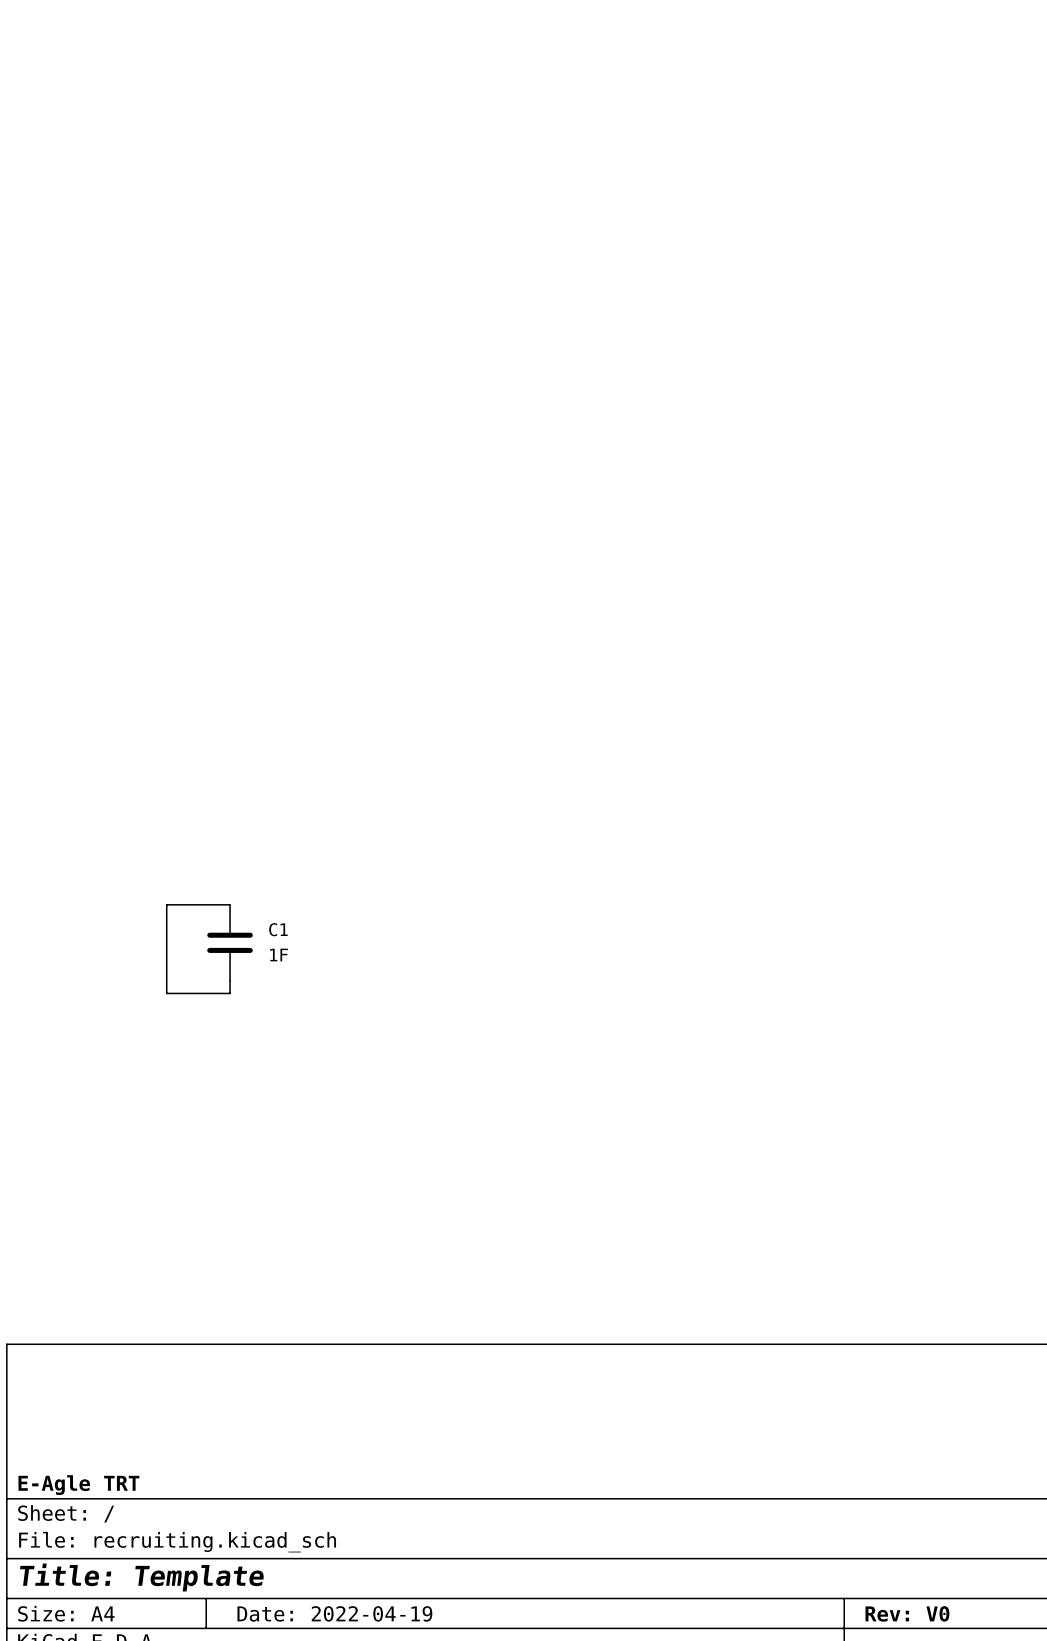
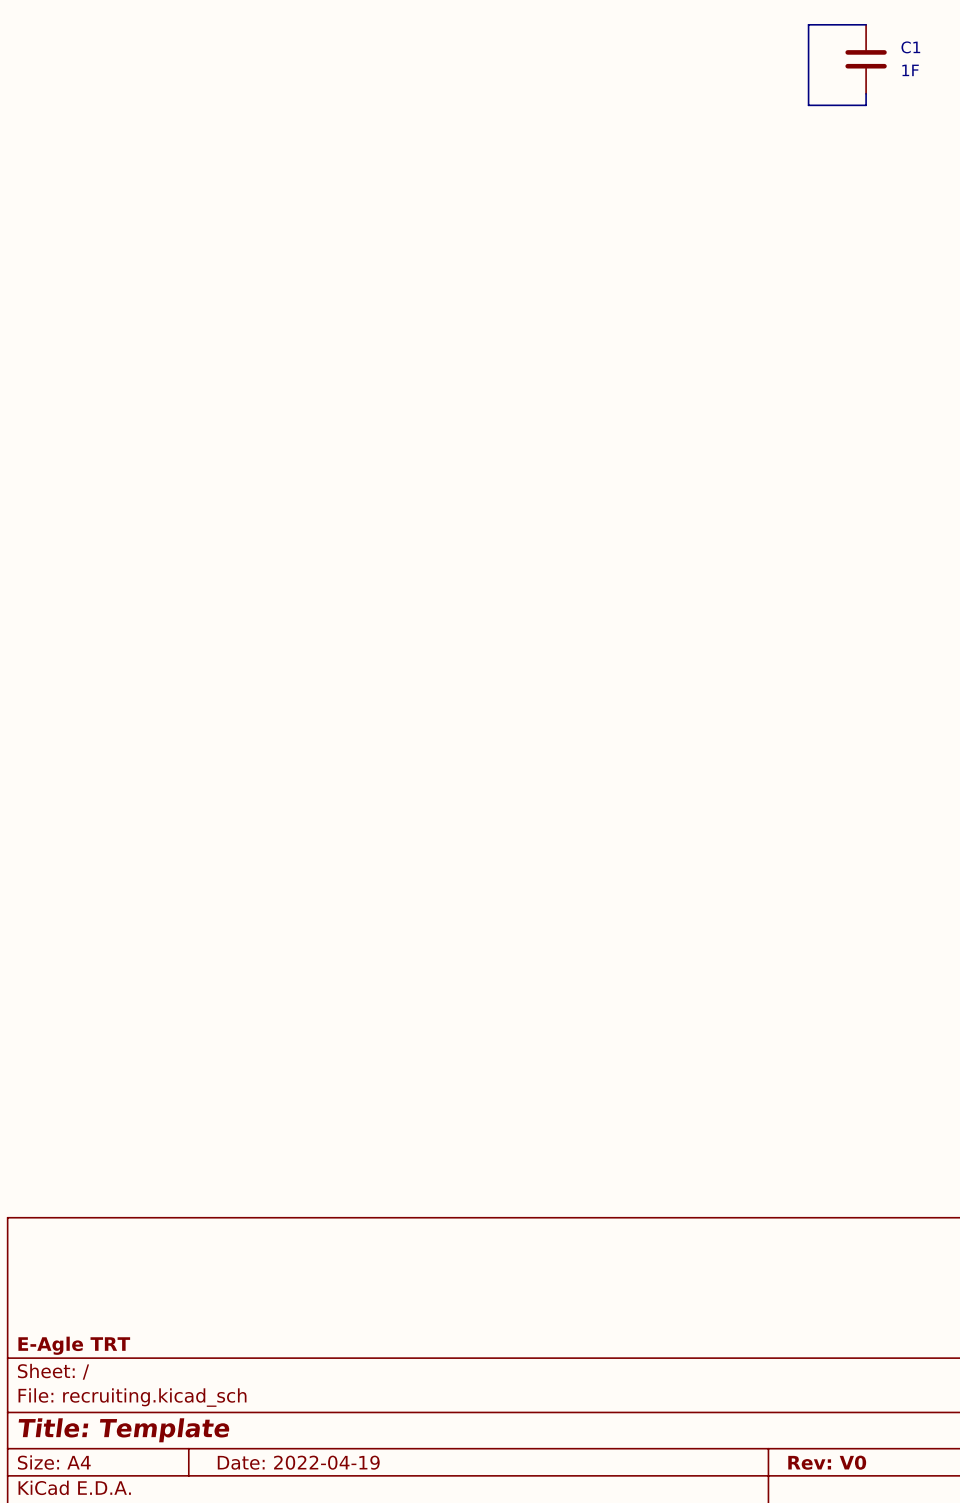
wire: none -> (866, 24) (808, 24) (808, 105) (866, 105) (866, 93)
wire: (230, 904) (166, 904) (166, 993) (230, 993) (230, 980) -> none
C1 position: (230, 942) -> (866, 59)

